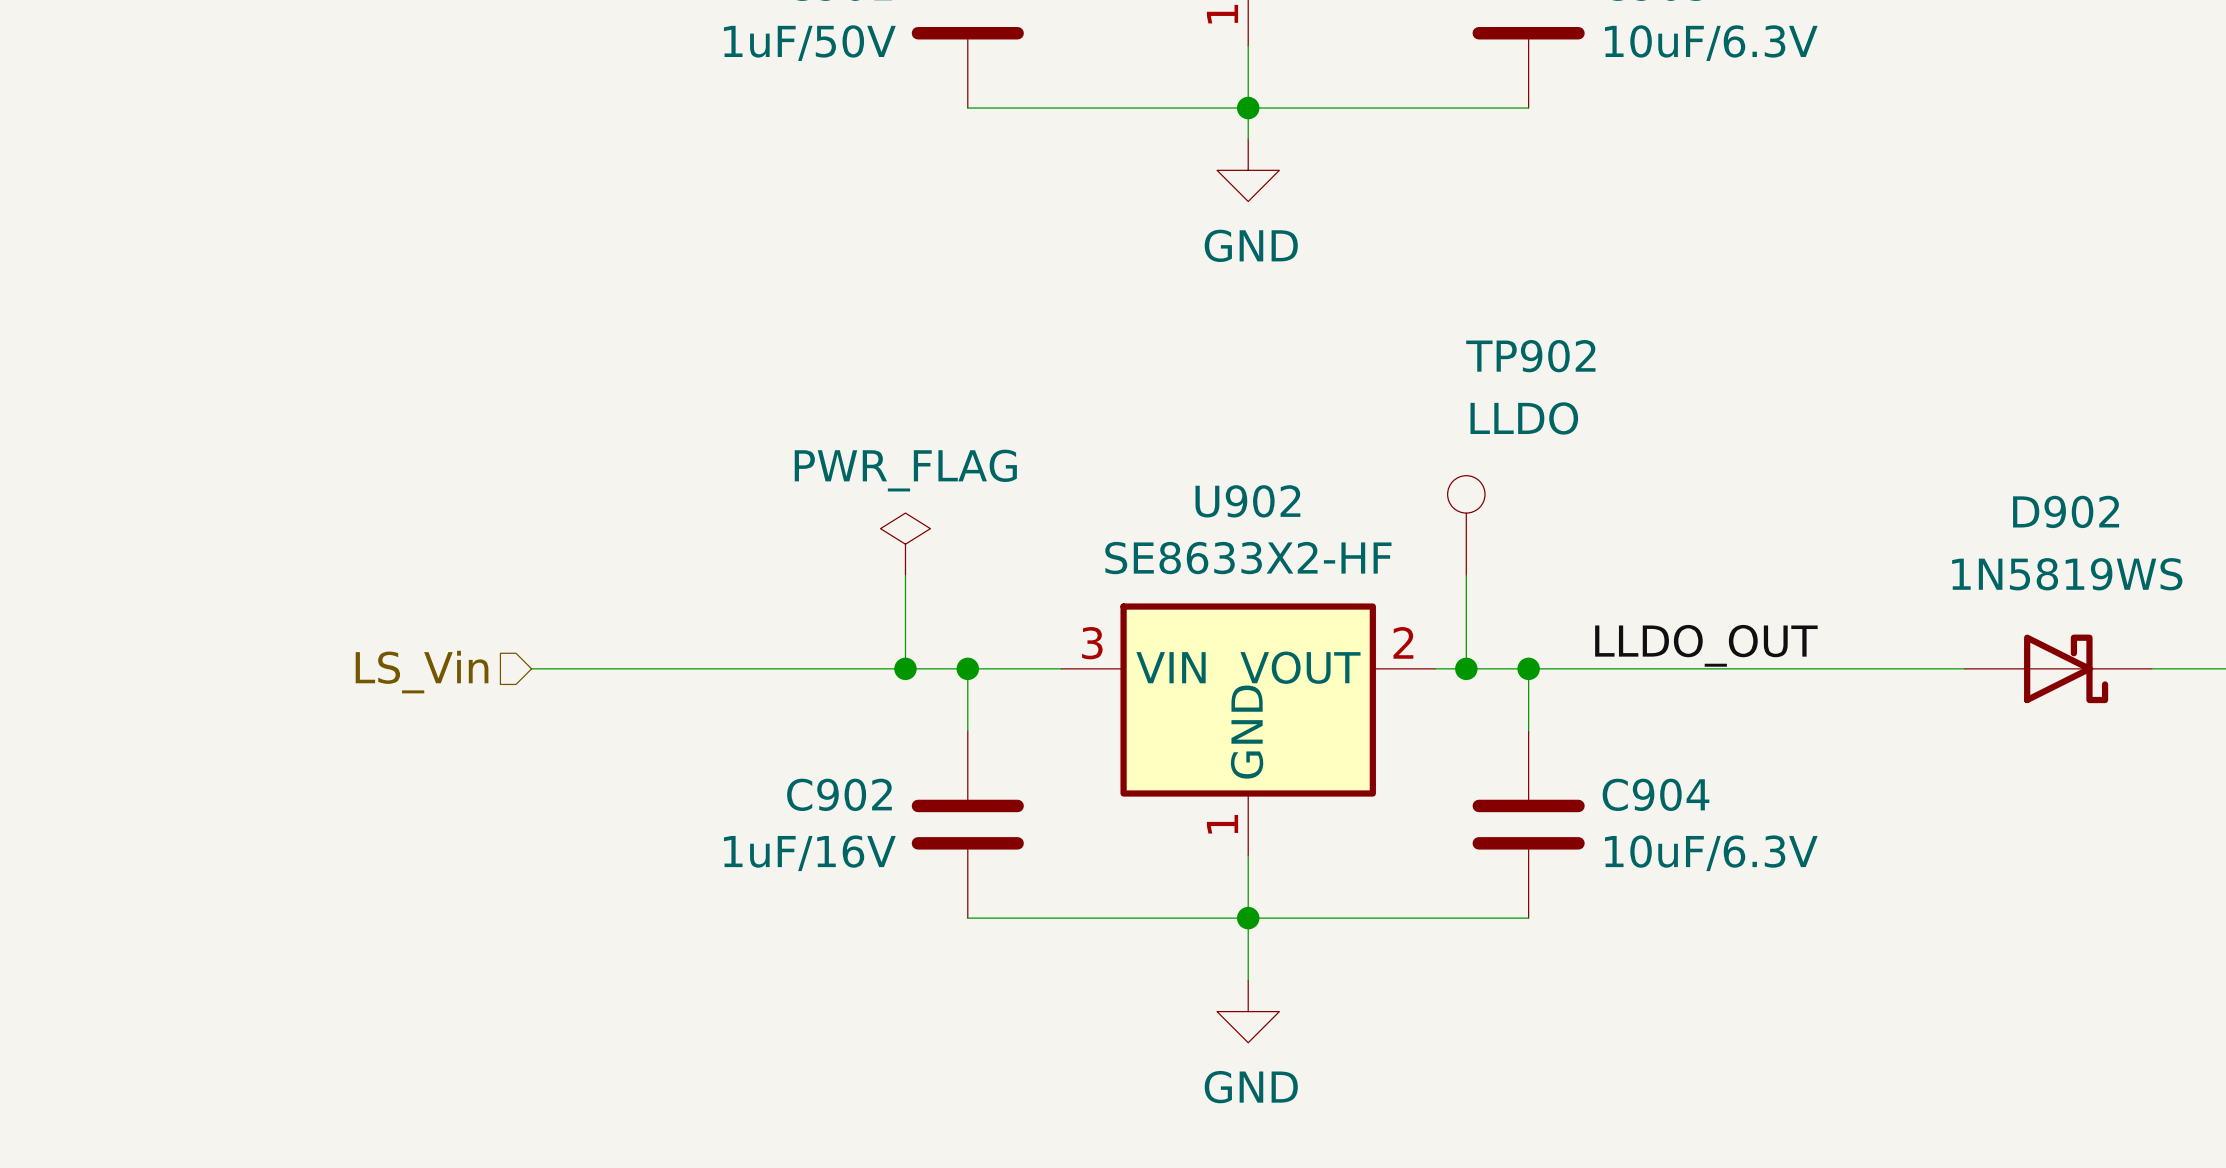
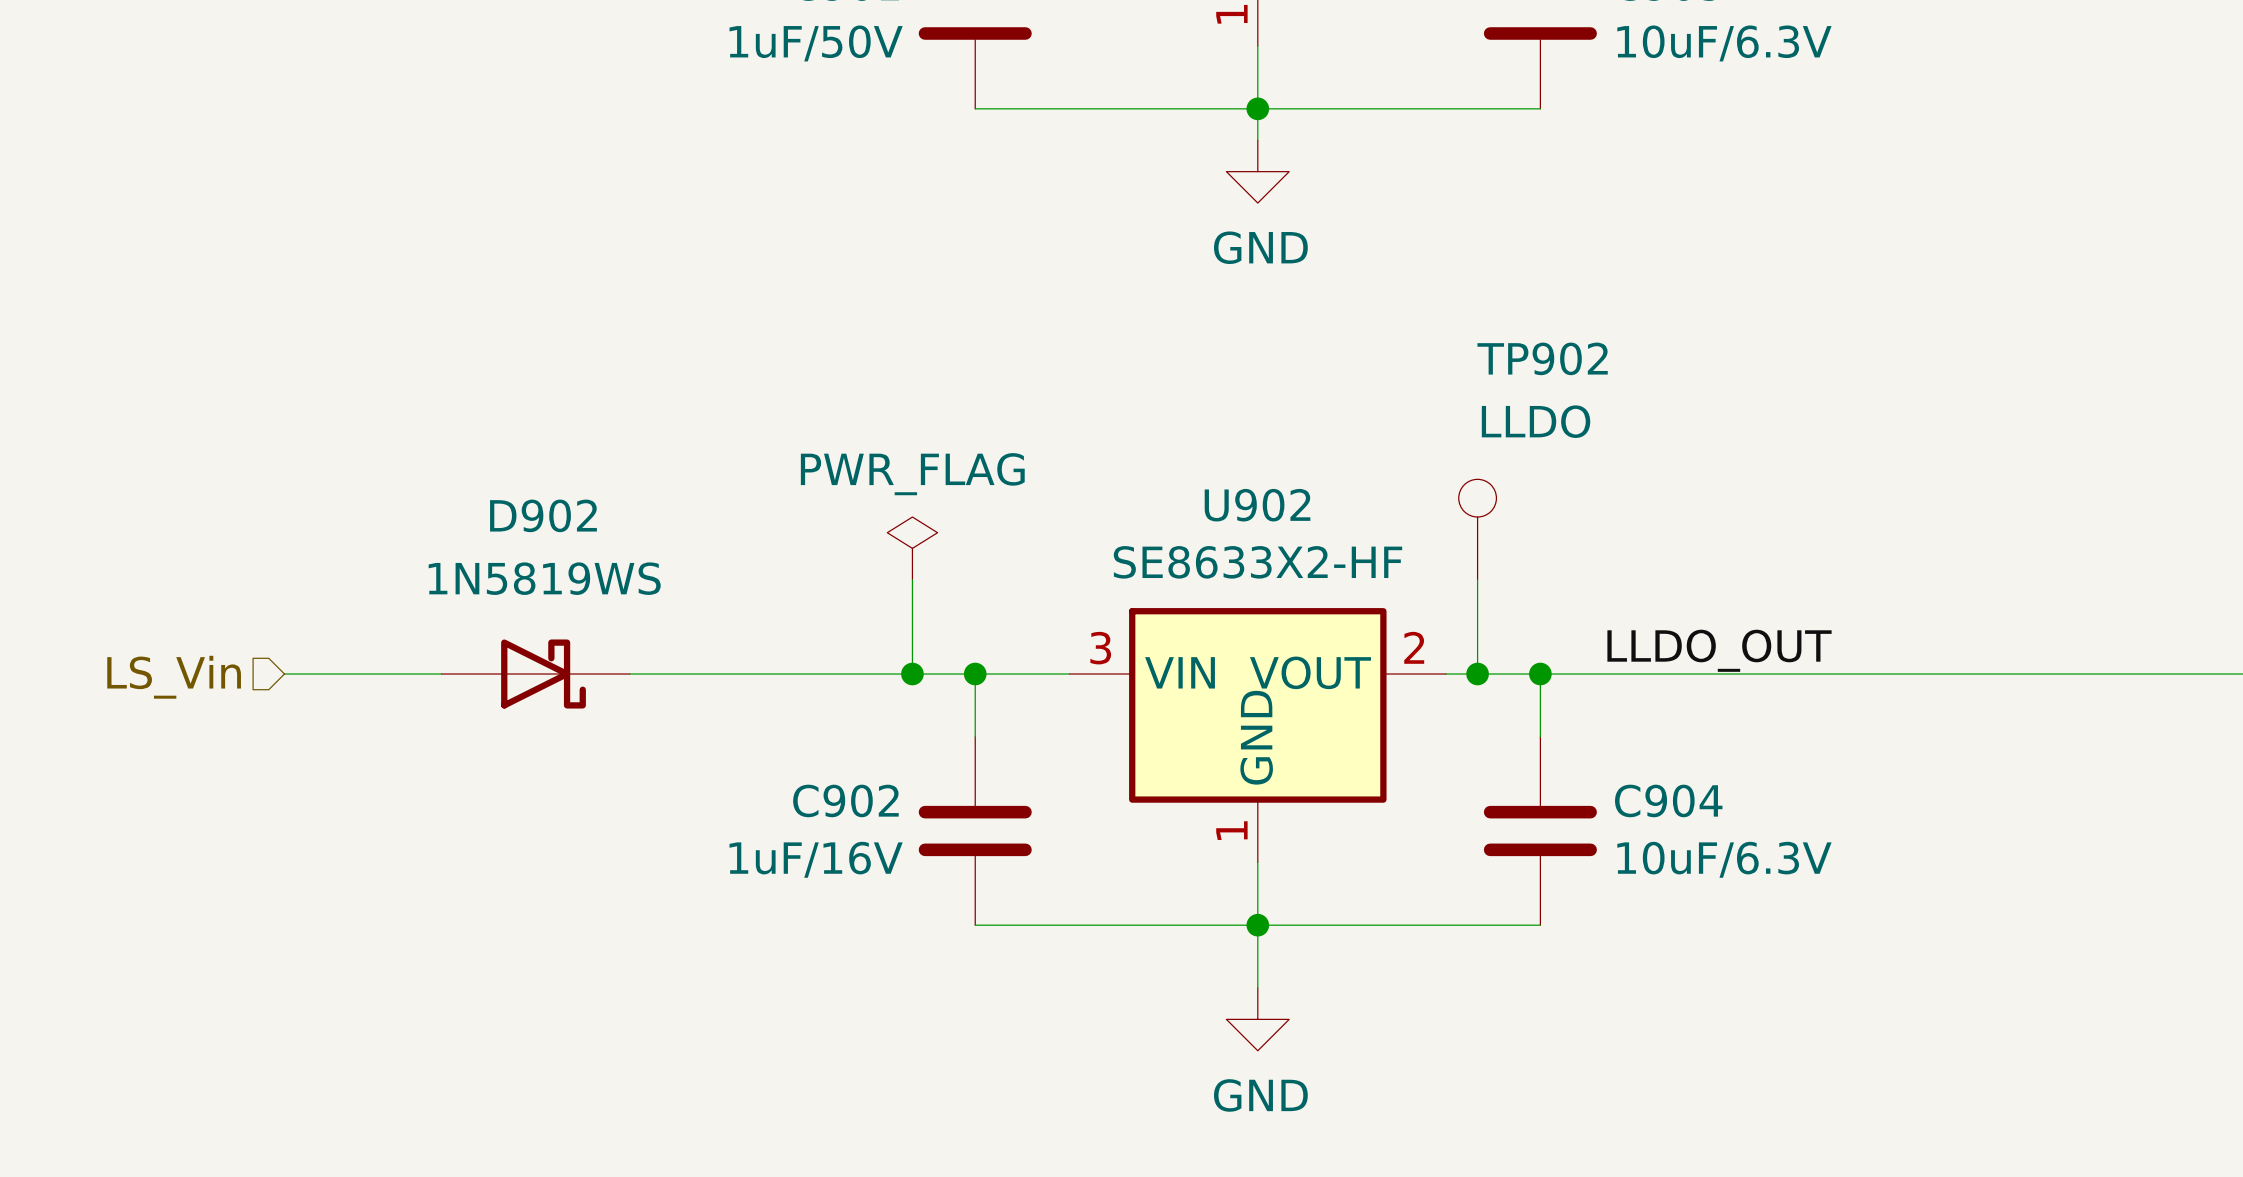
wire: none -> (284, 674) (441, 674)
D902 position: (2058, 668) -> (535, 674)
hierarchical label position: LS_Vin (422, 672) -> LS_Vin (174, 677)

